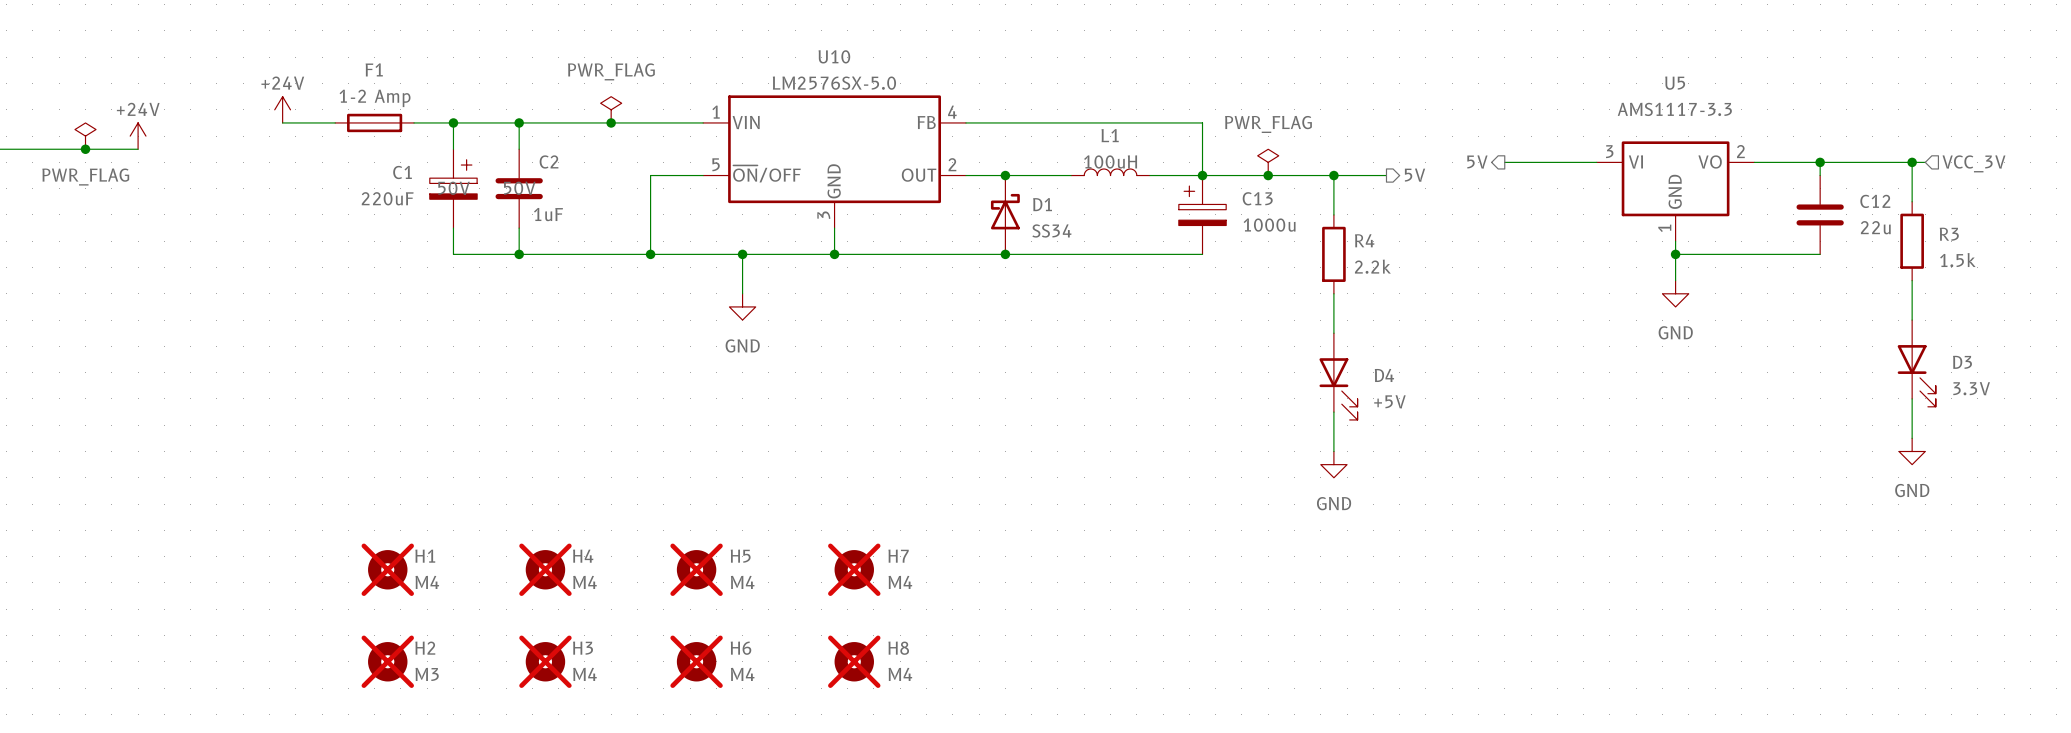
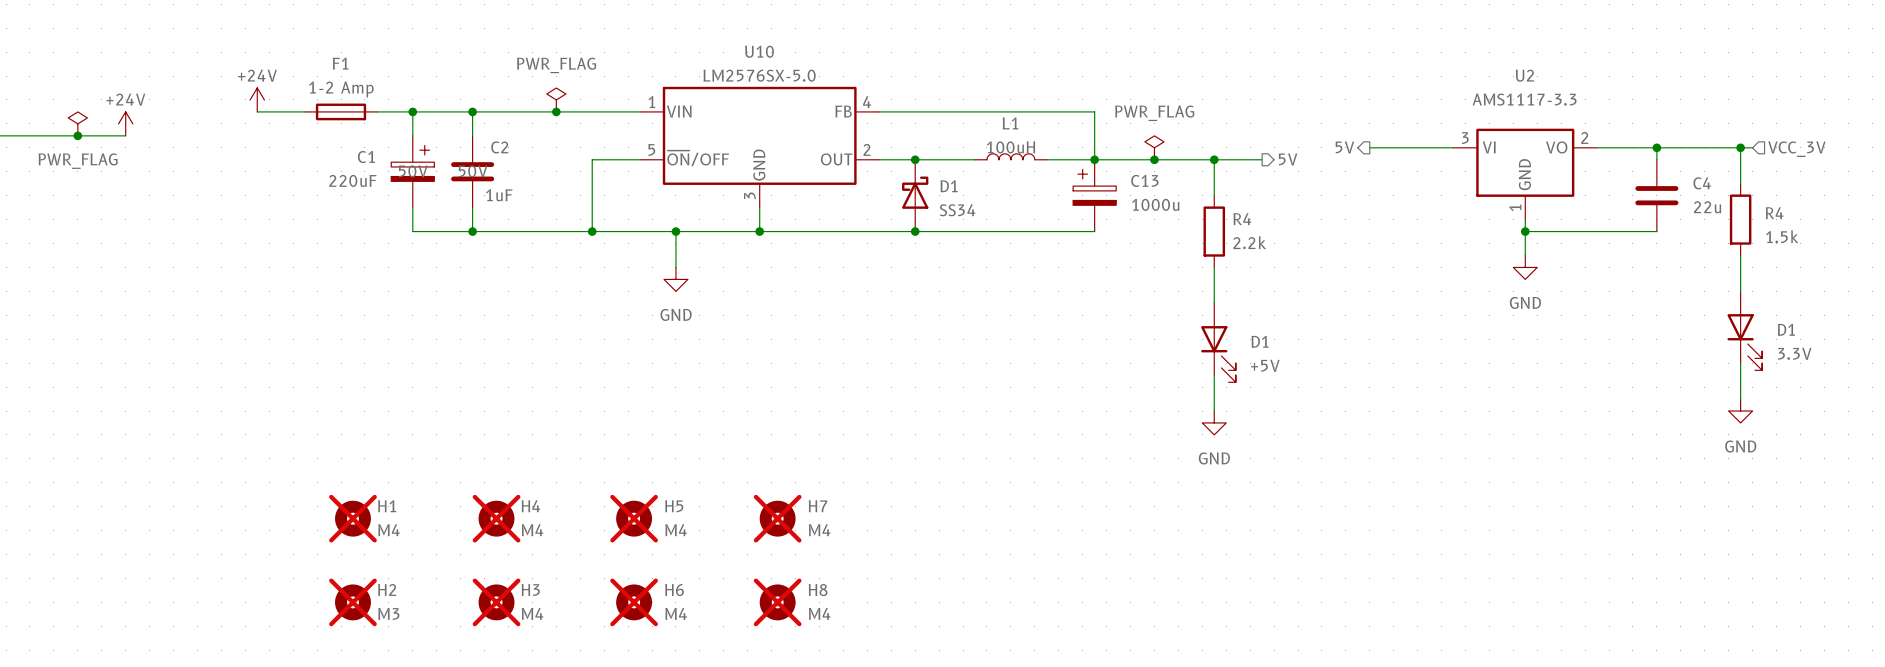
U5 name: U5 (1675, 83) -> U2 (1524, 75)
C12 name: C12 (1875, 201) -> C4 (1702, 183)
R3 name: R3 (1949, 234) -> R4 (1774, 213)
D3 name: D3 (1962, 362) -> D1 (1786, 329)
D4 name: D4 (1384, 375) -> D1 (1260, 341)

